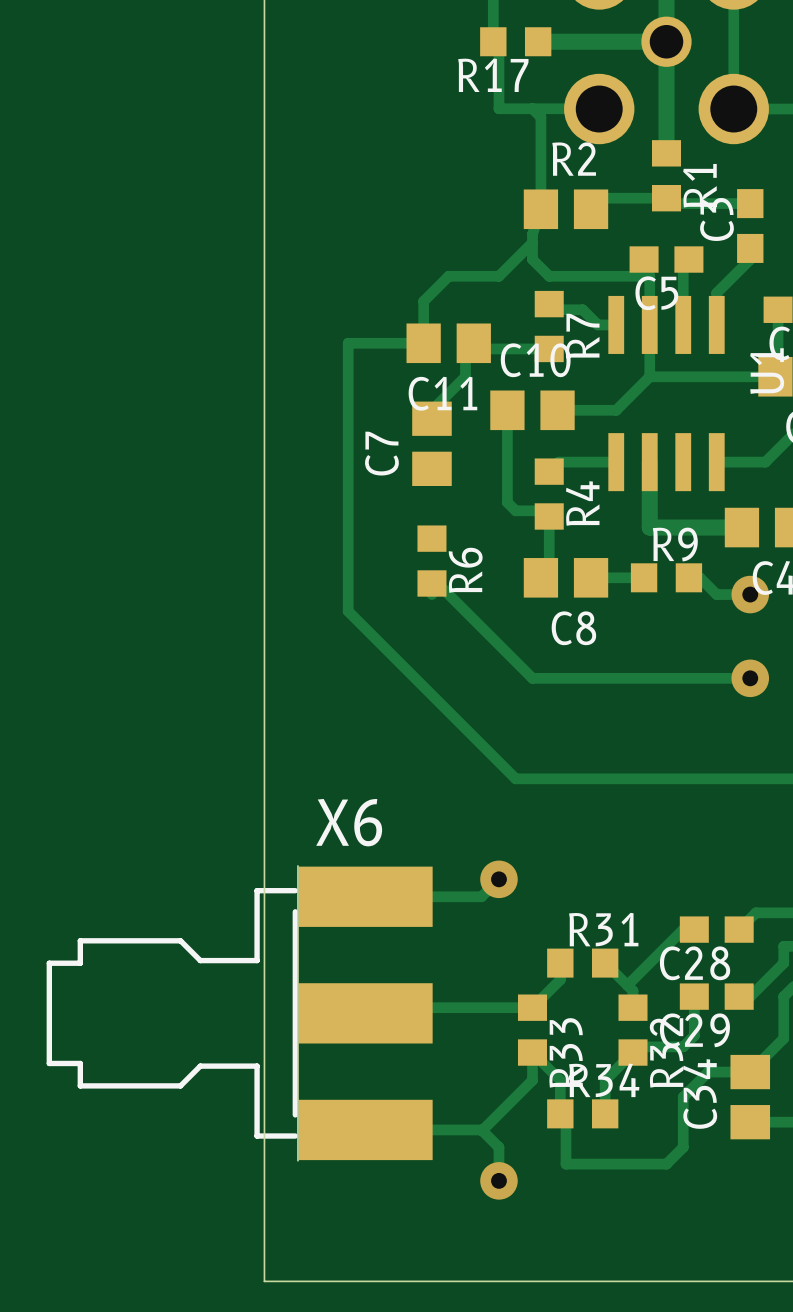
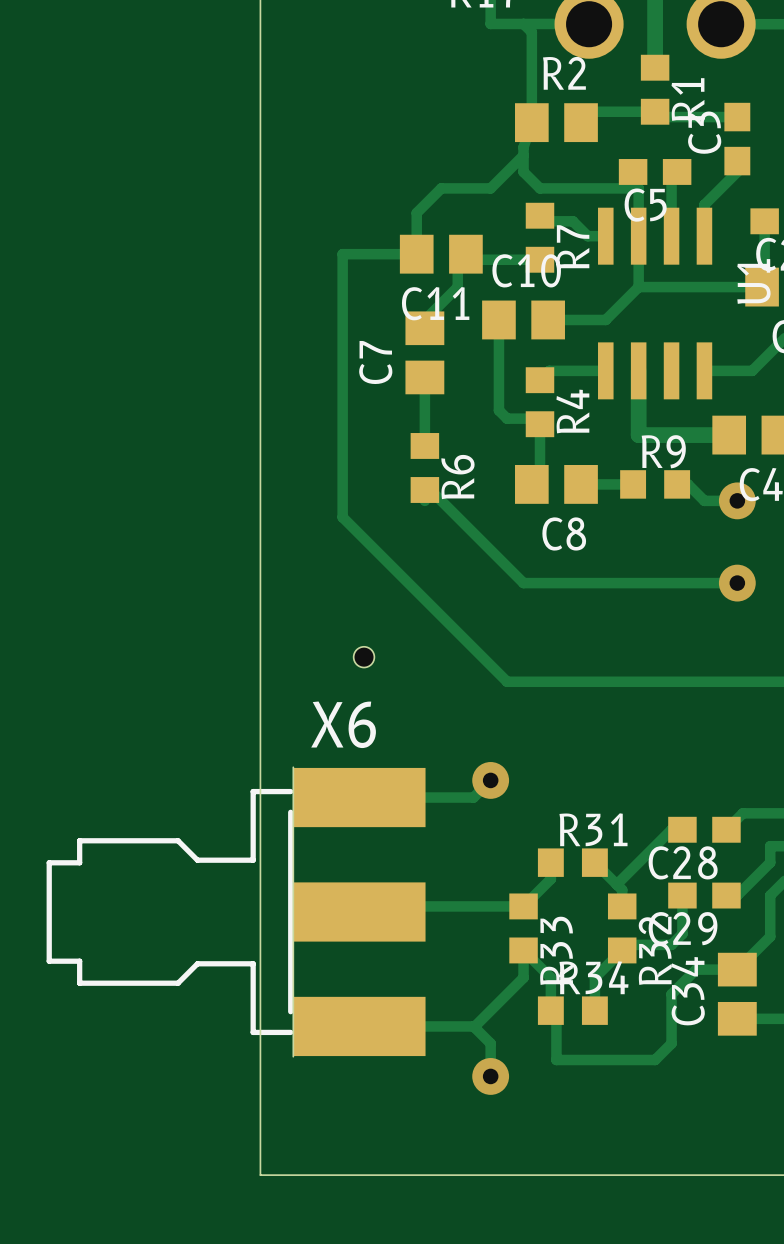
track: none -> (424, 377) (424, 445)
hole: none -> (364, 657)

